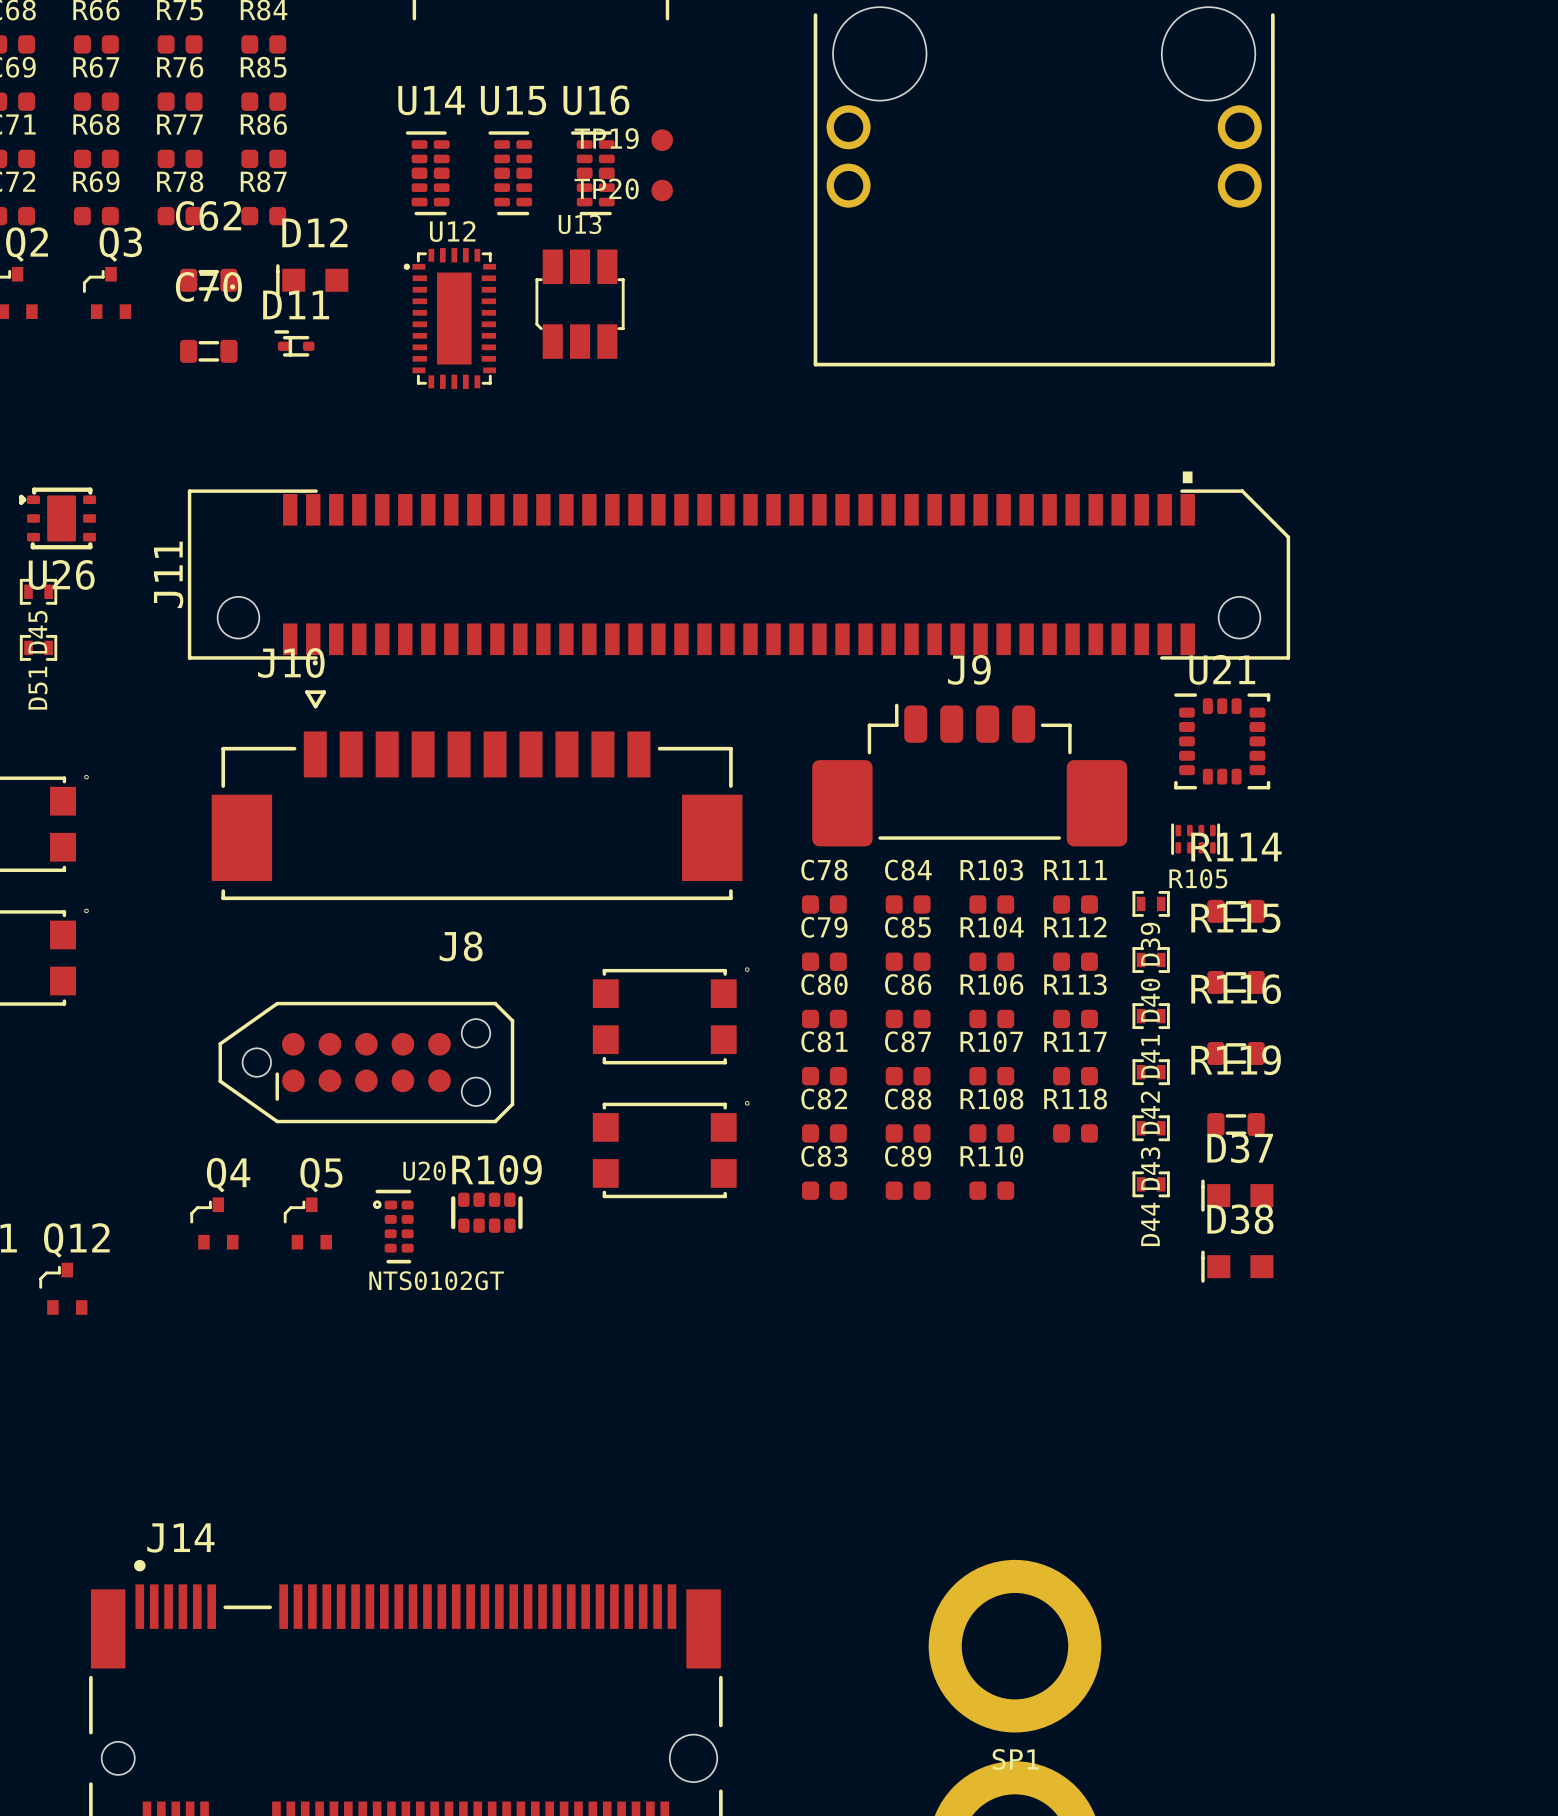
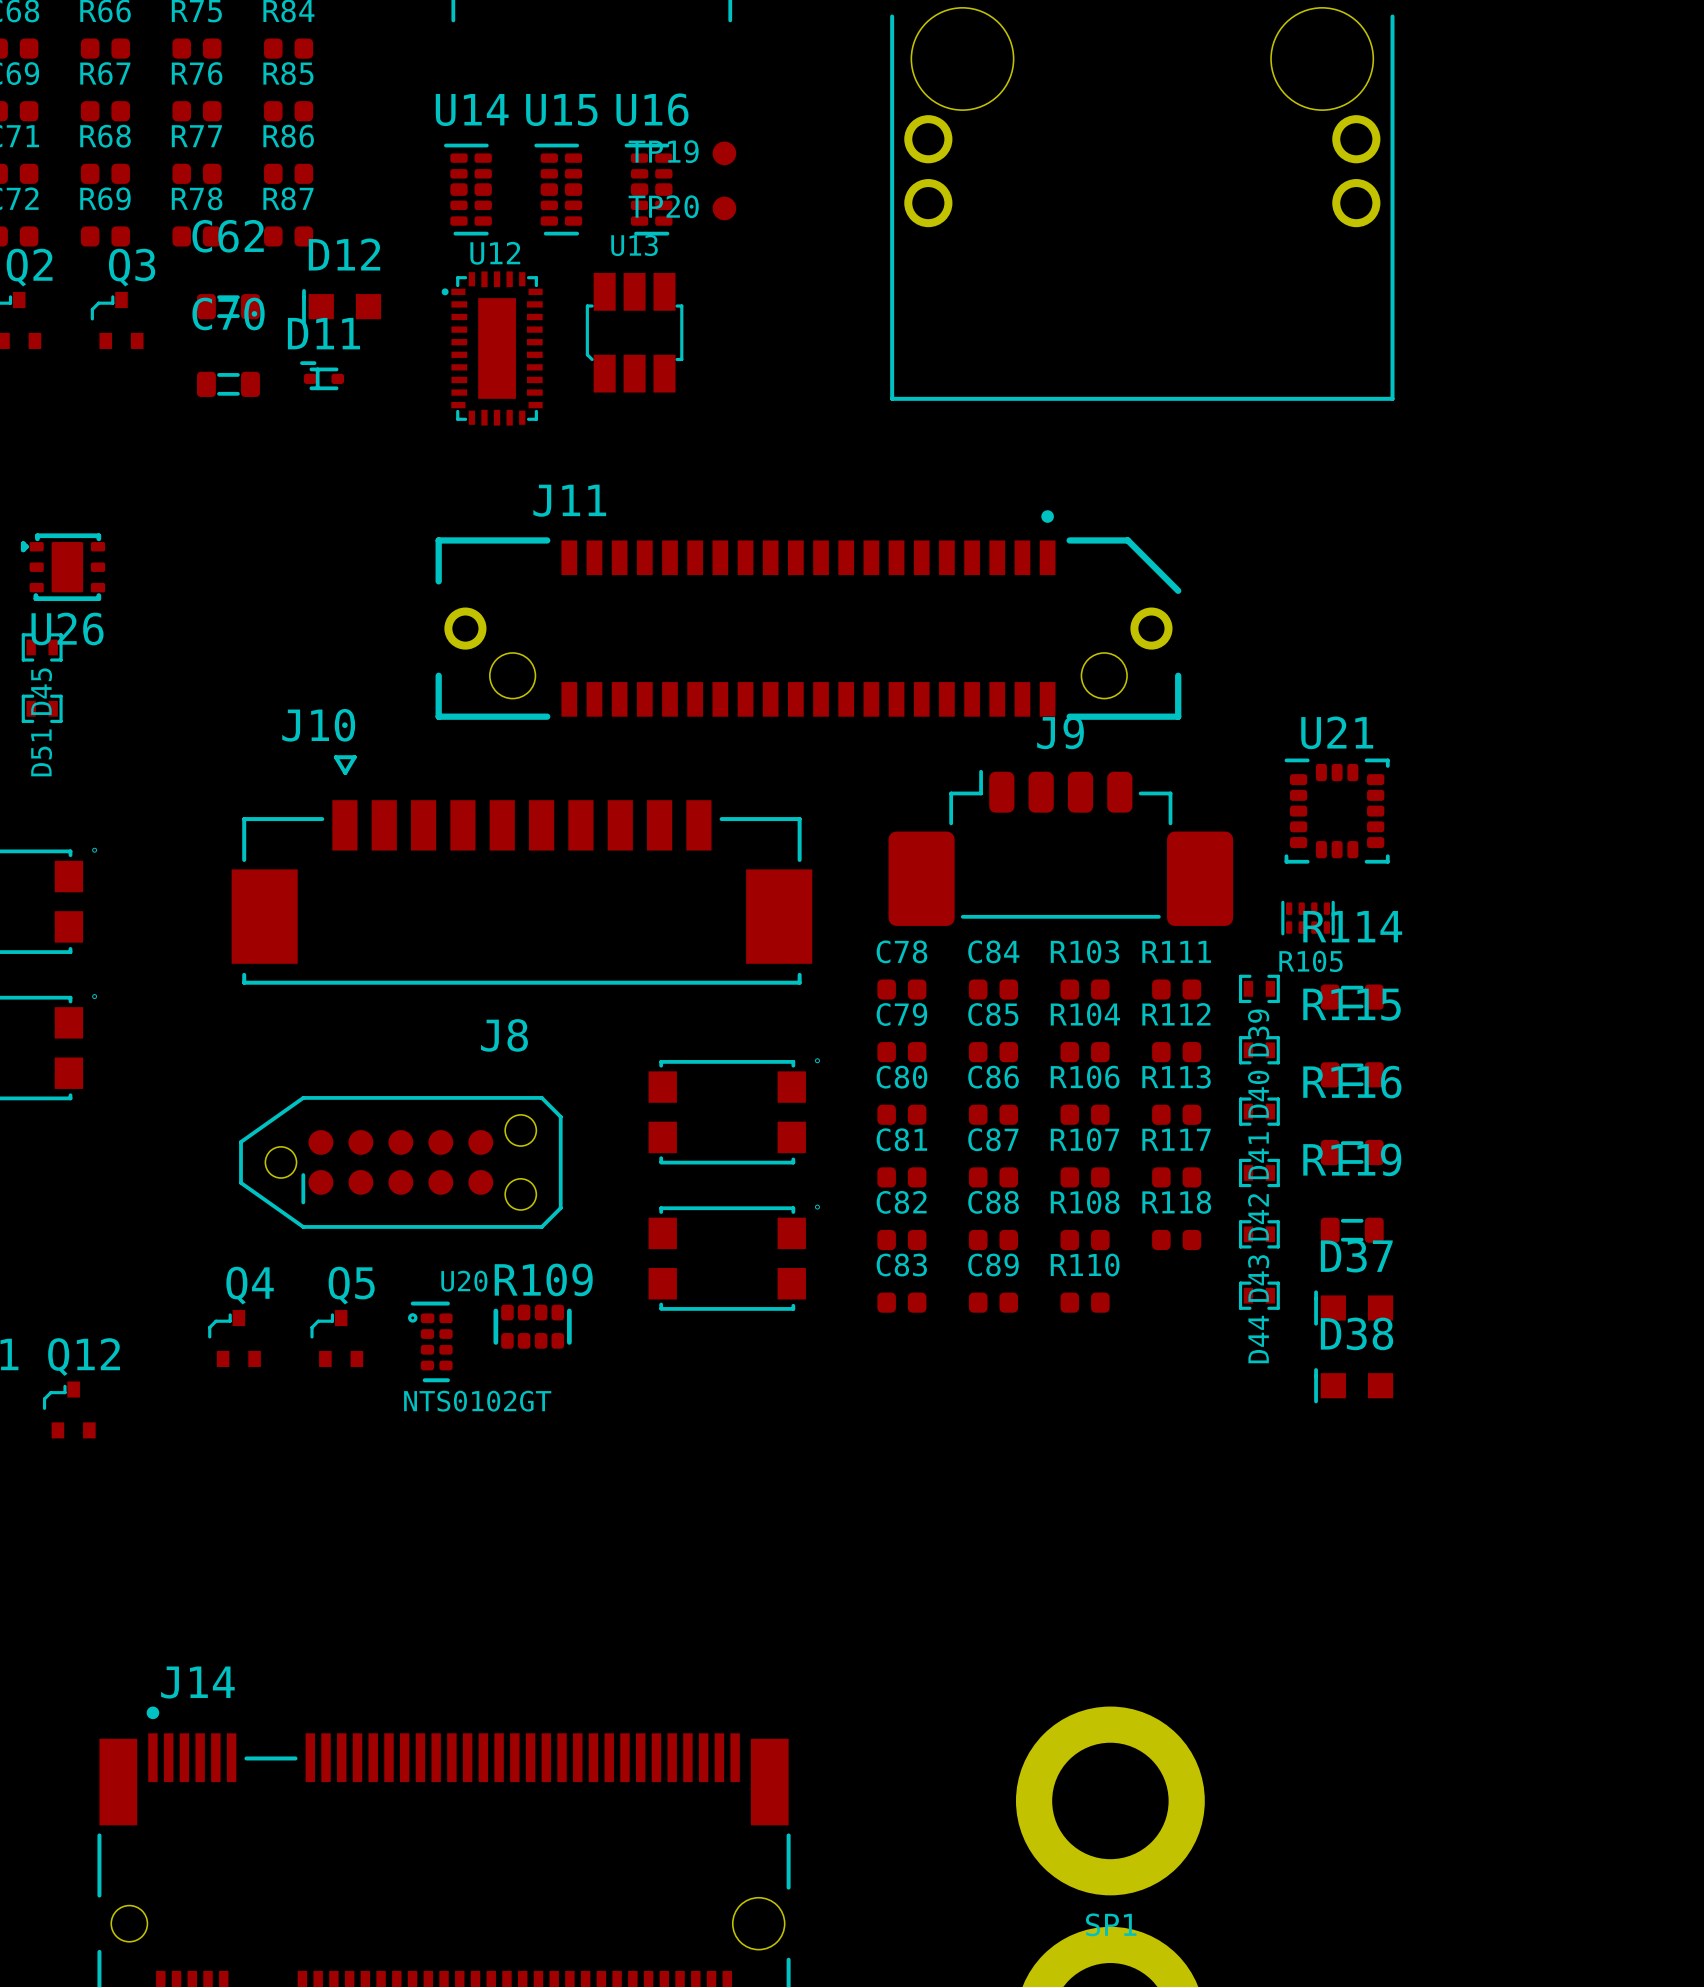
J11 footprint: [187, 489, 1291, 660] -> [435, 510, 1182, 720]
J11 name position: J11 (168, 574) -> J11 (569, 500)

